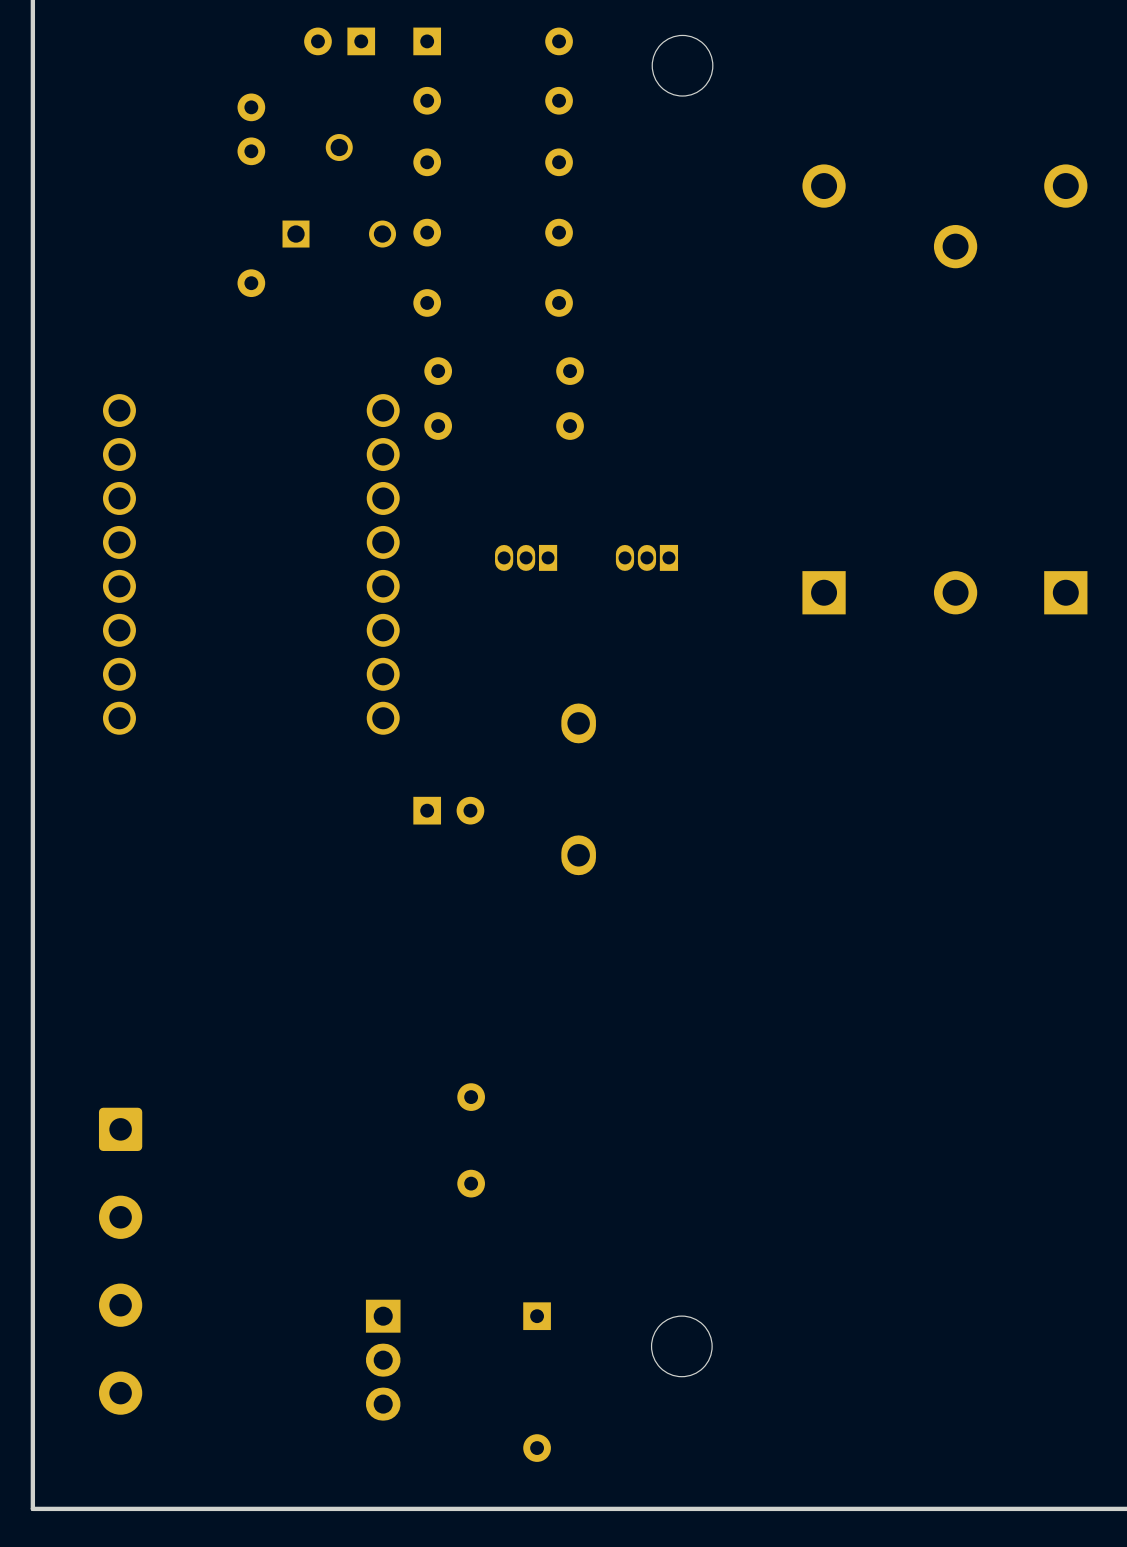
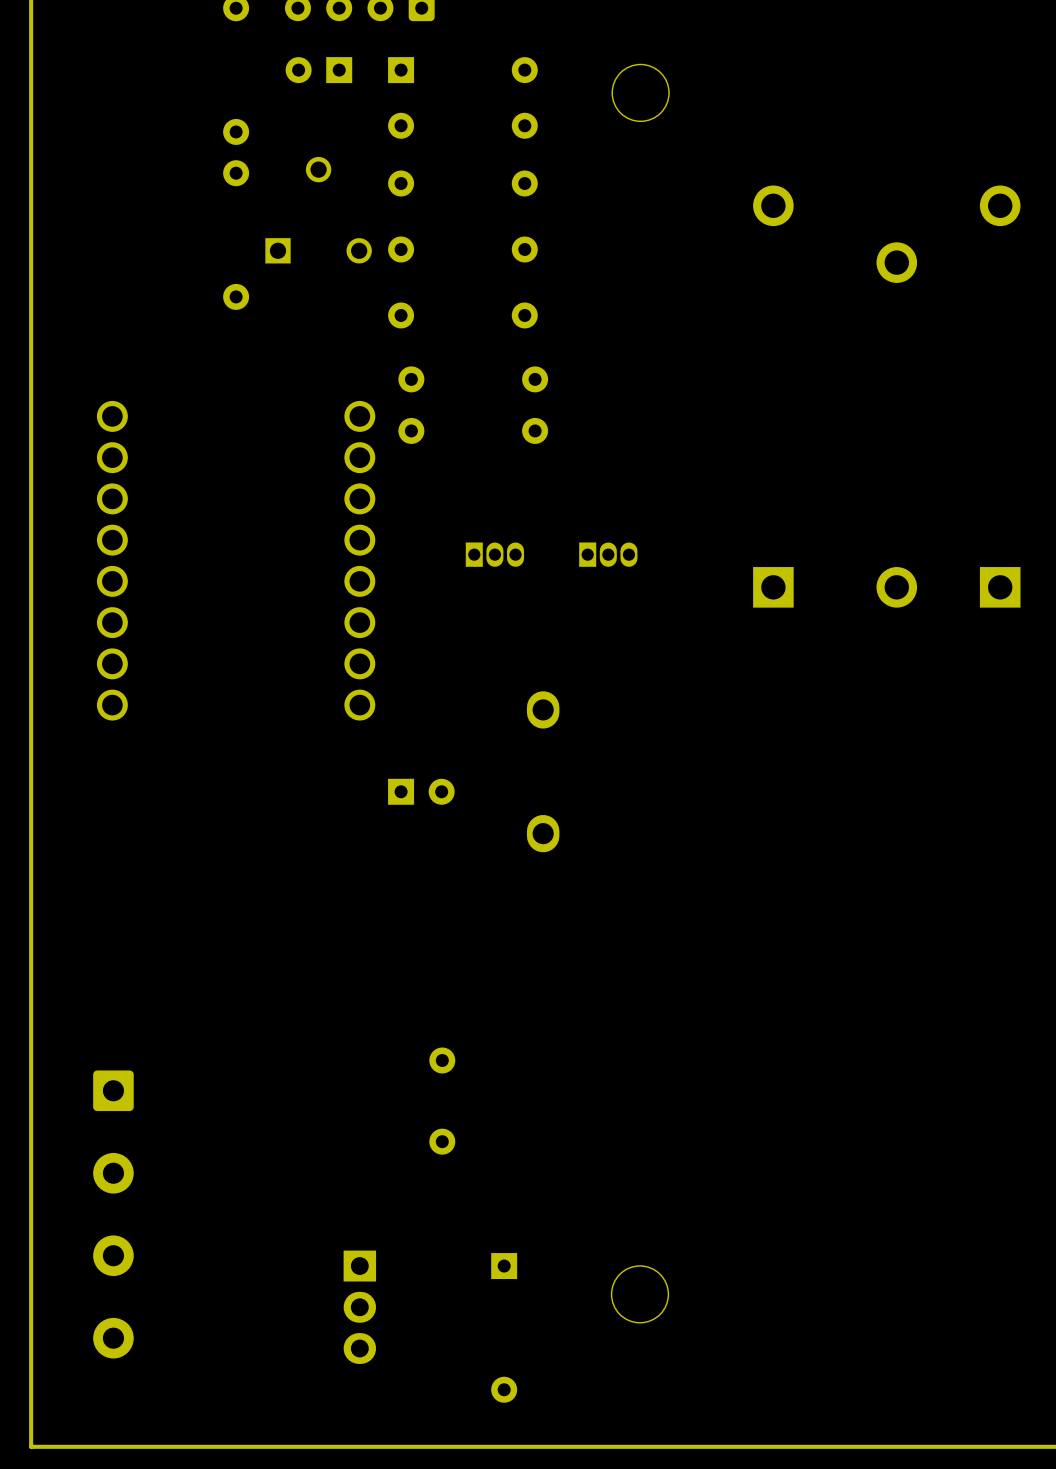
part rotation: 0° (526, 557) -> 180° (494, 554)
part rotation: 0° (646, 557) -> 180° (608, 554)

